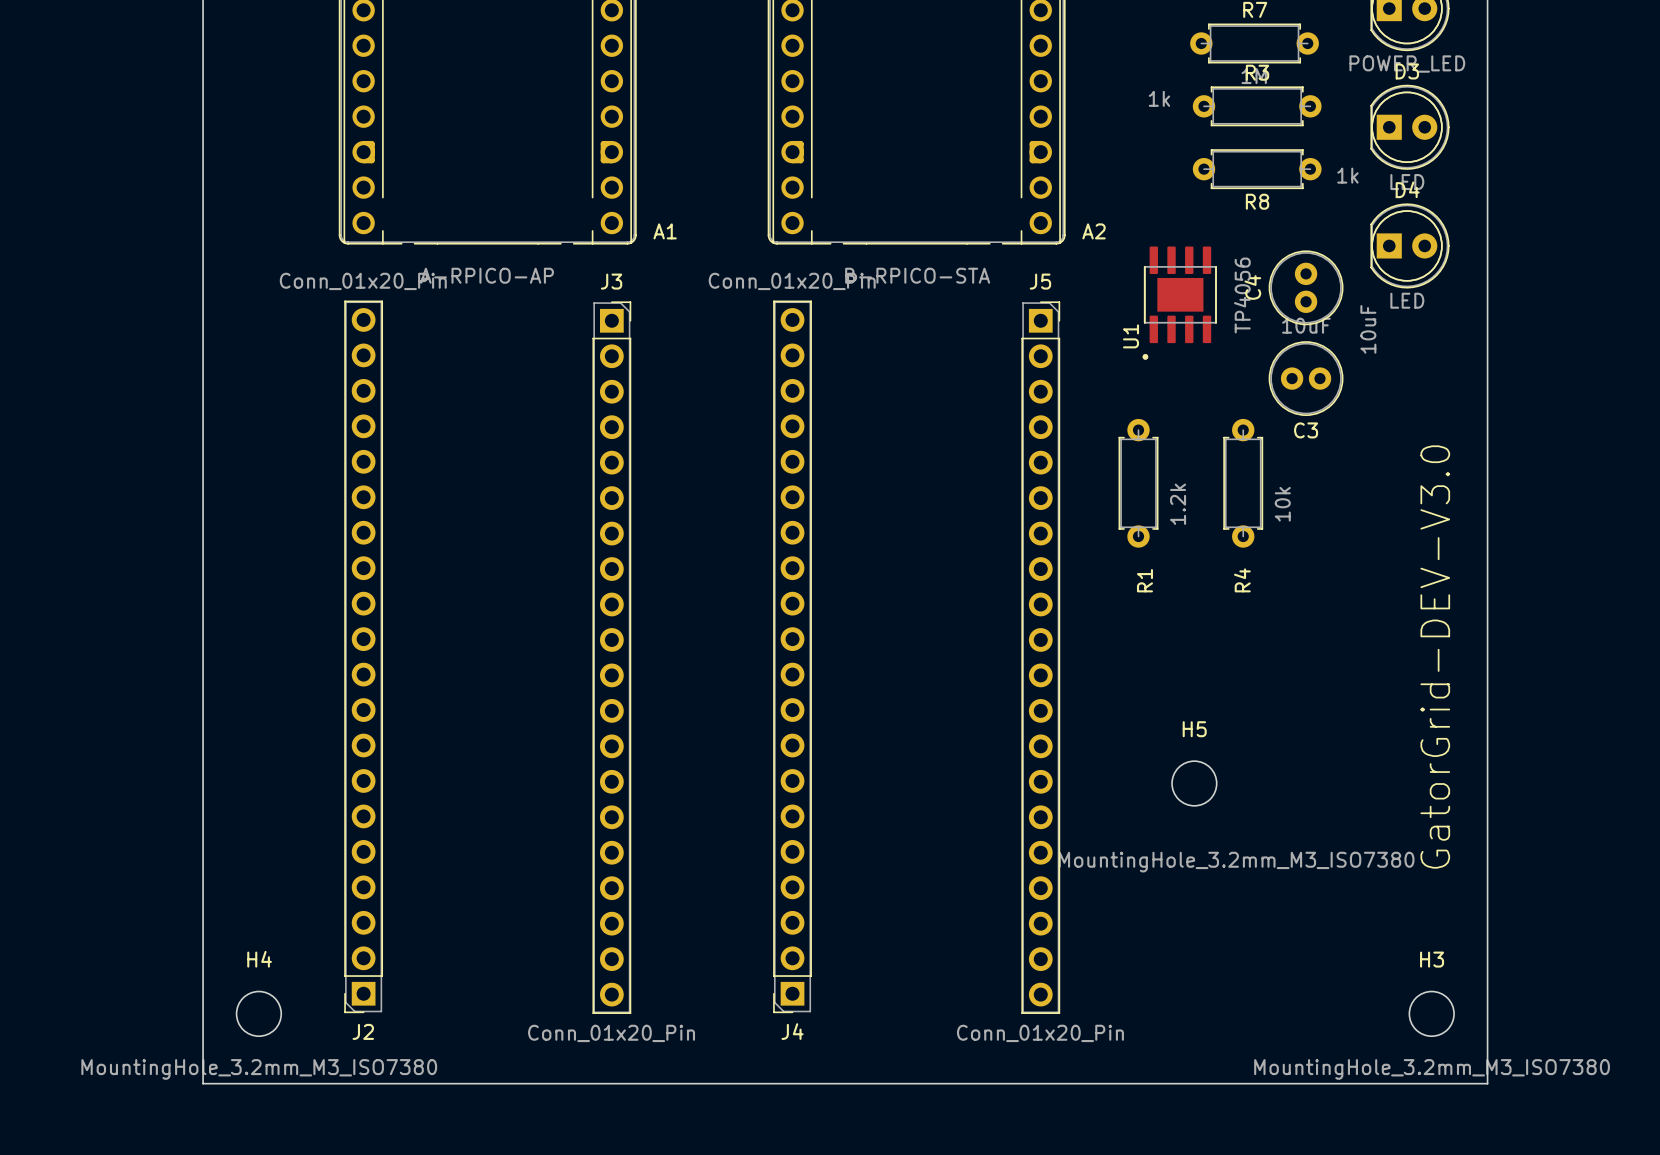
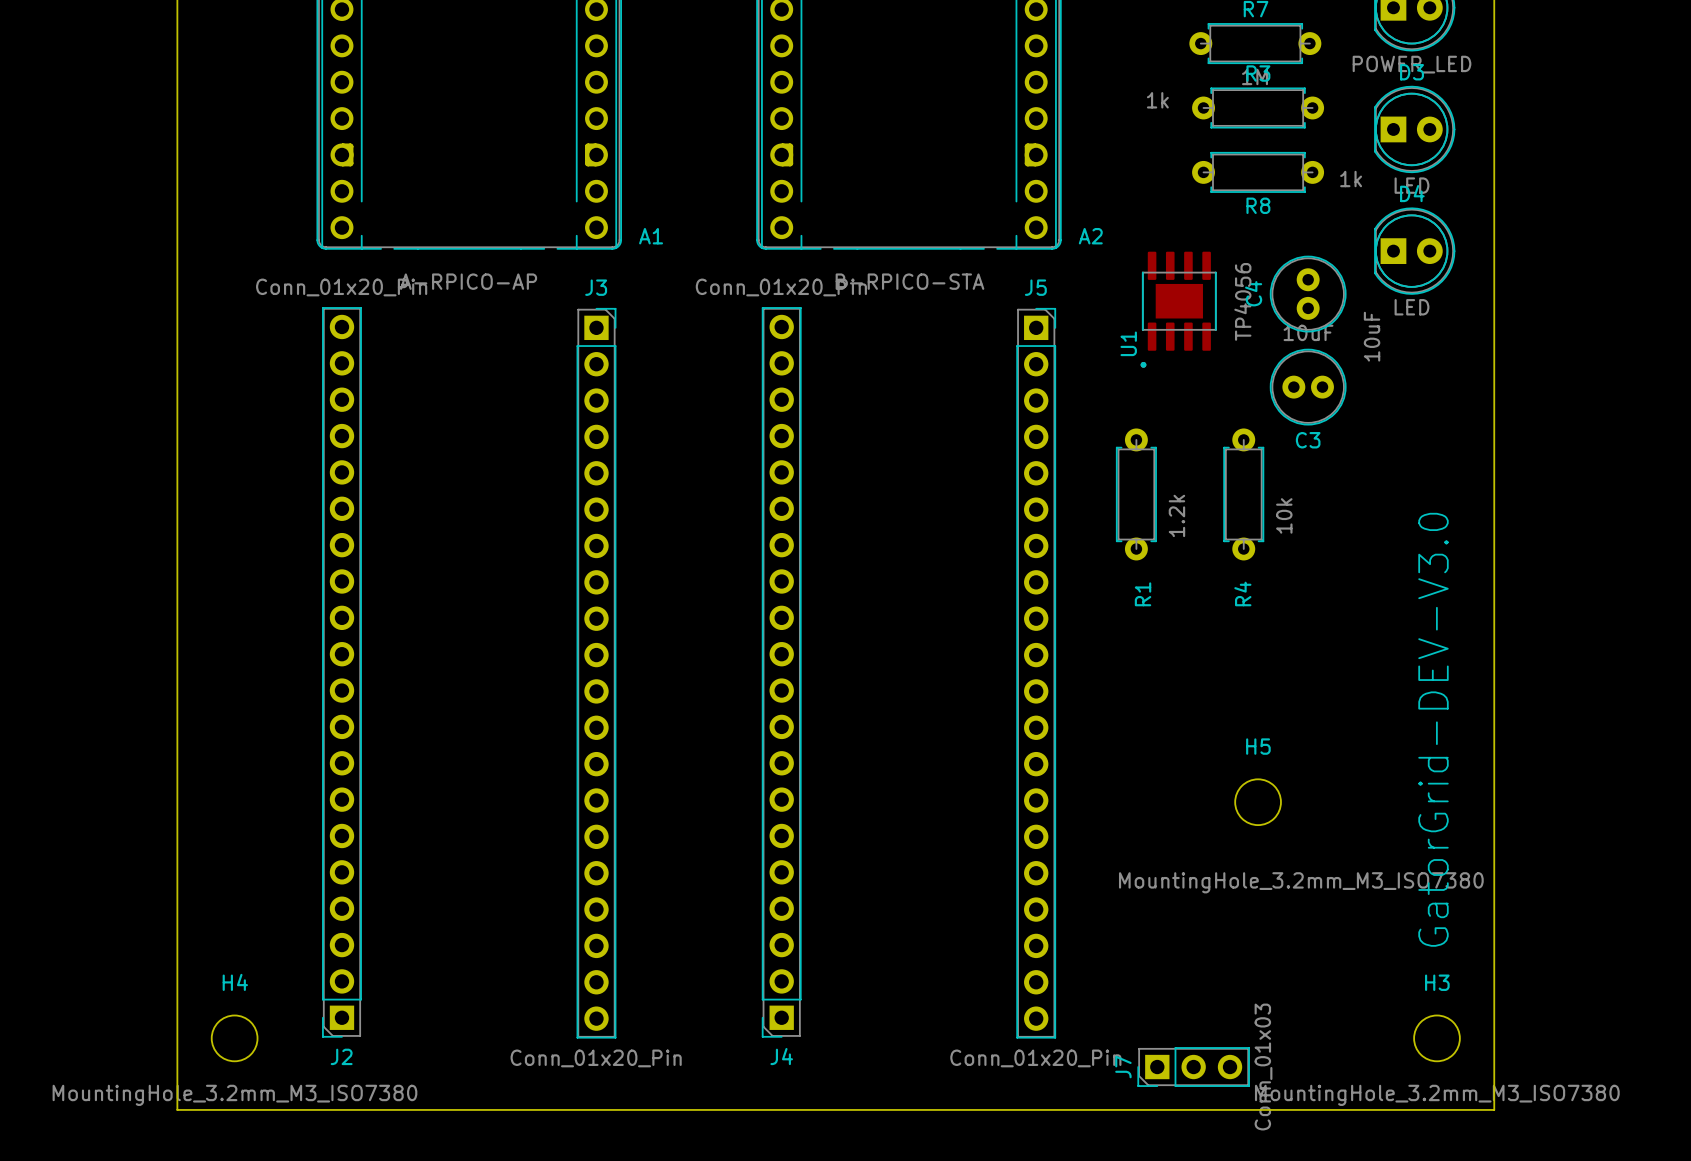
text position: GatorGrid-DEV-V3.0 (1435, 657) -> GatorGrid-DEV-V3.0 (1433, 729)
H5 position: (1194, 783) -> (1258, 802)
J7: none -> Conn_01x03 (1193, 1067)

